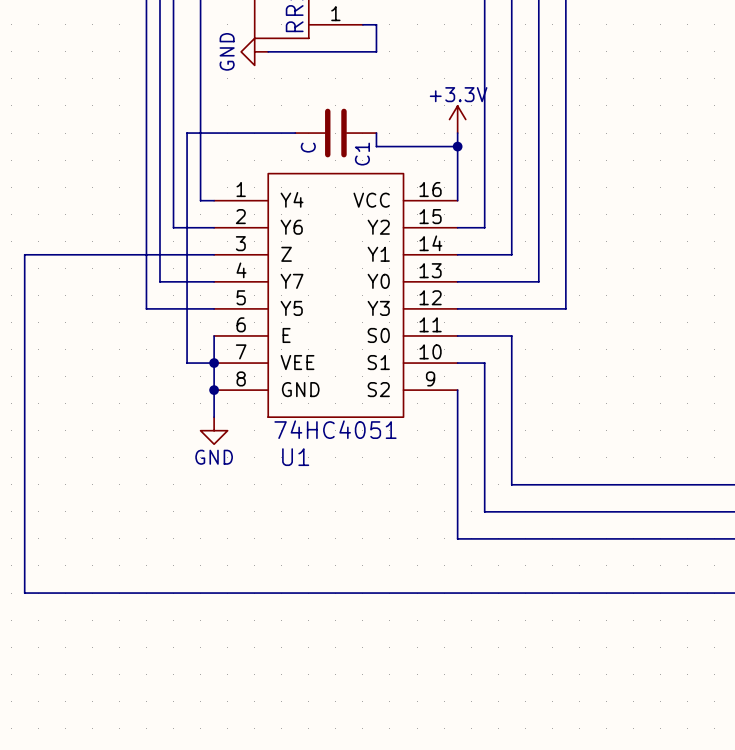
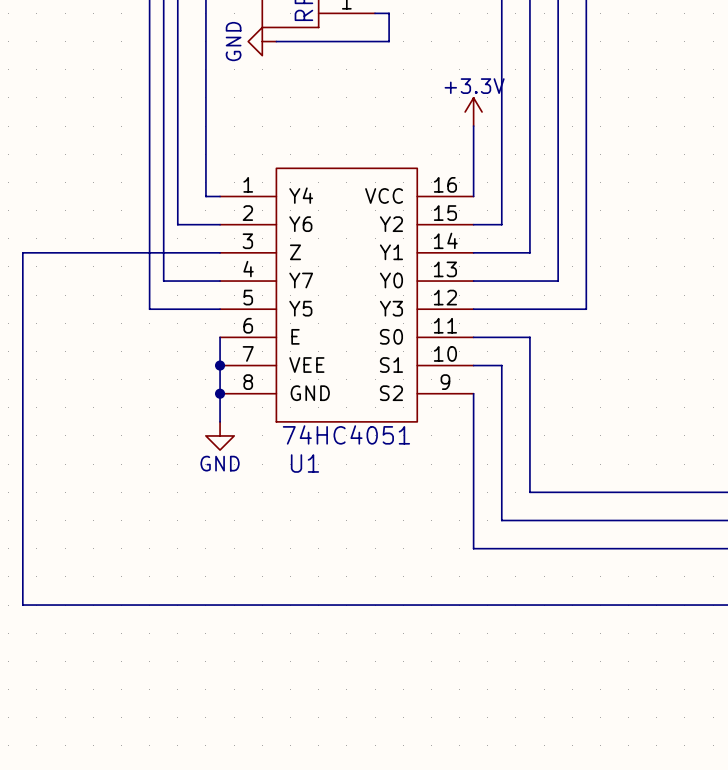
wire: (295, 133) (187, 133) (187, 363) (214, 363) -> none
C1: C (335, 133) -> none
wire: (376, 133) (376, 146) (457, 146) -> none
junction: (457, 146) -> none

